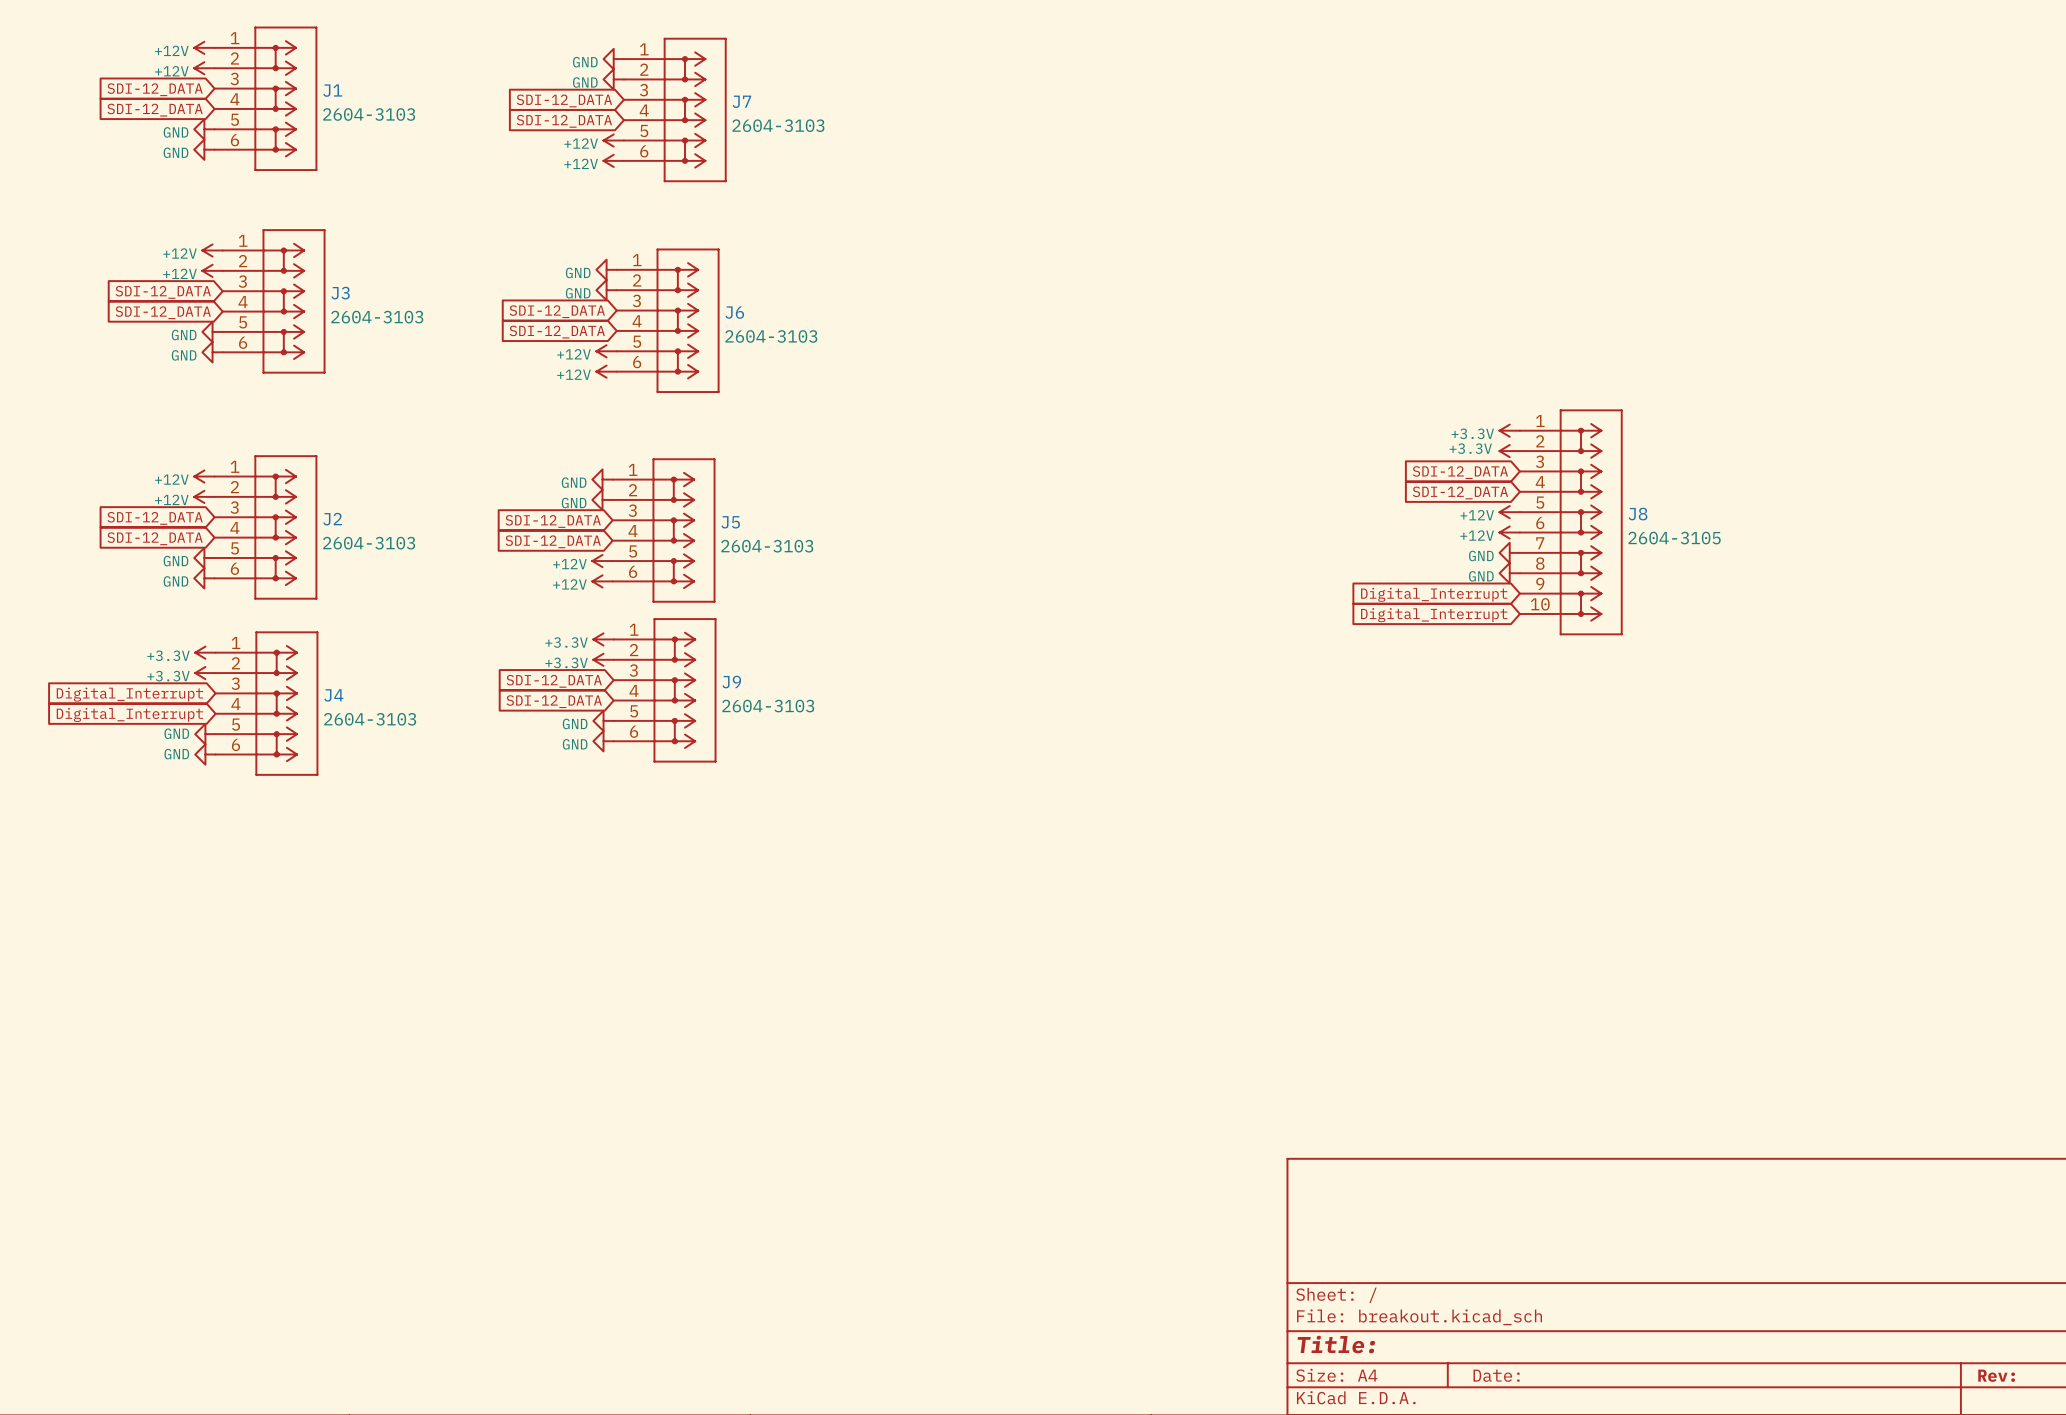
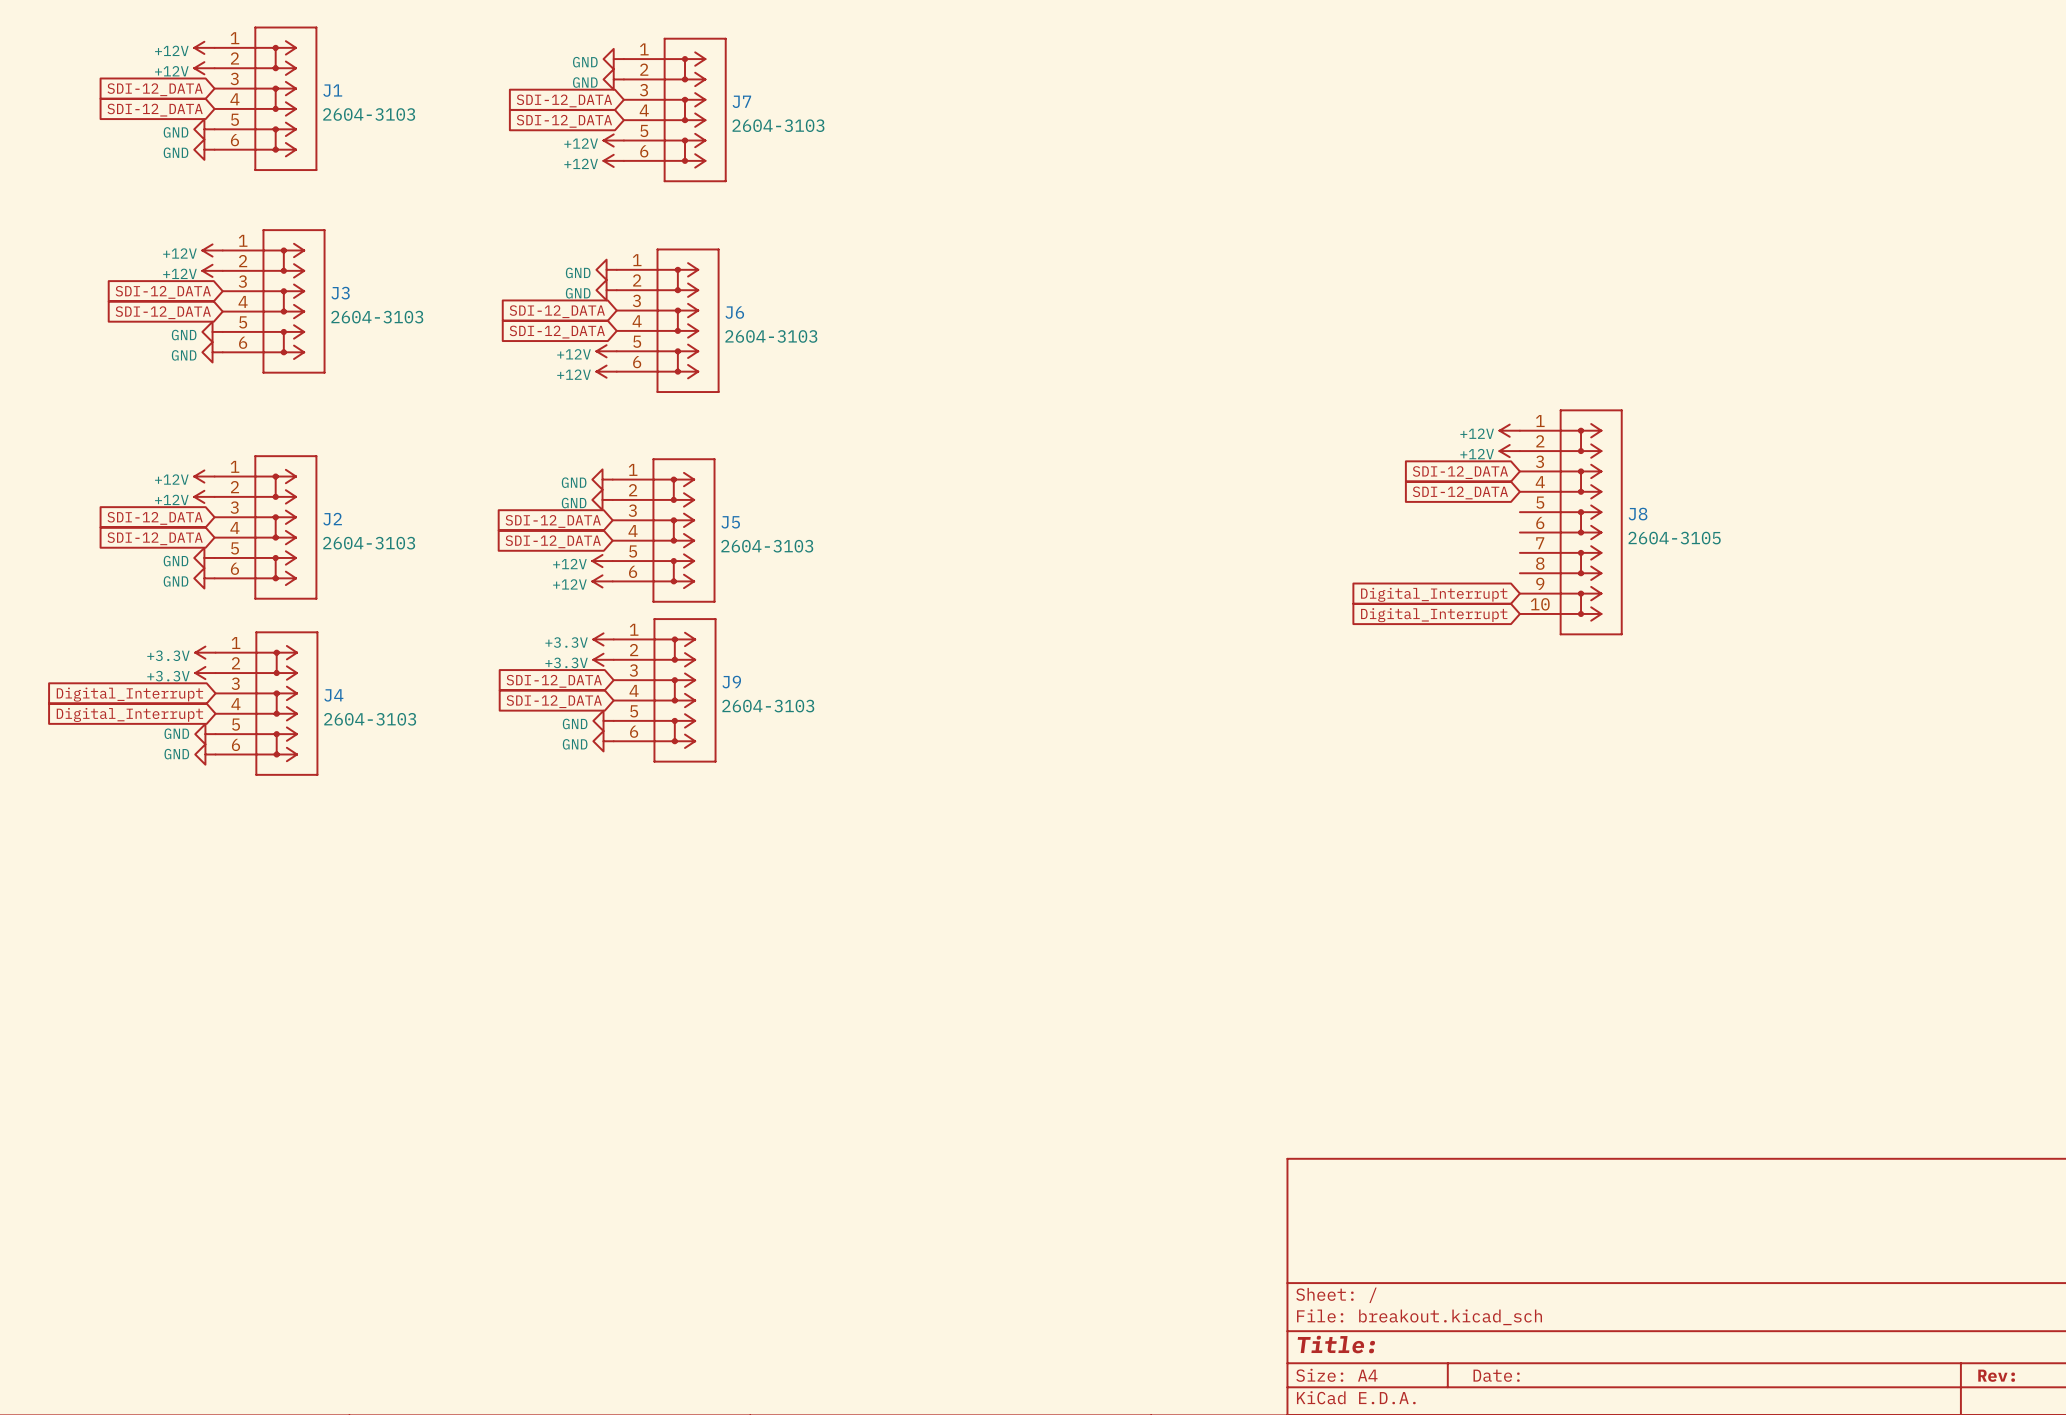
power symbol: +3.3V (1509, 430) -> +12V (1509, 430)
power symbol: +3.3V (1509, 451) -> +12V (1509, 451)
power symbol: +12V (1509, 512) -> none
power symbol: +12V (1509, 532) -> none
power symbol: GND (1509, 552) -> none
power symbol: GND (1509, 573) -> none

